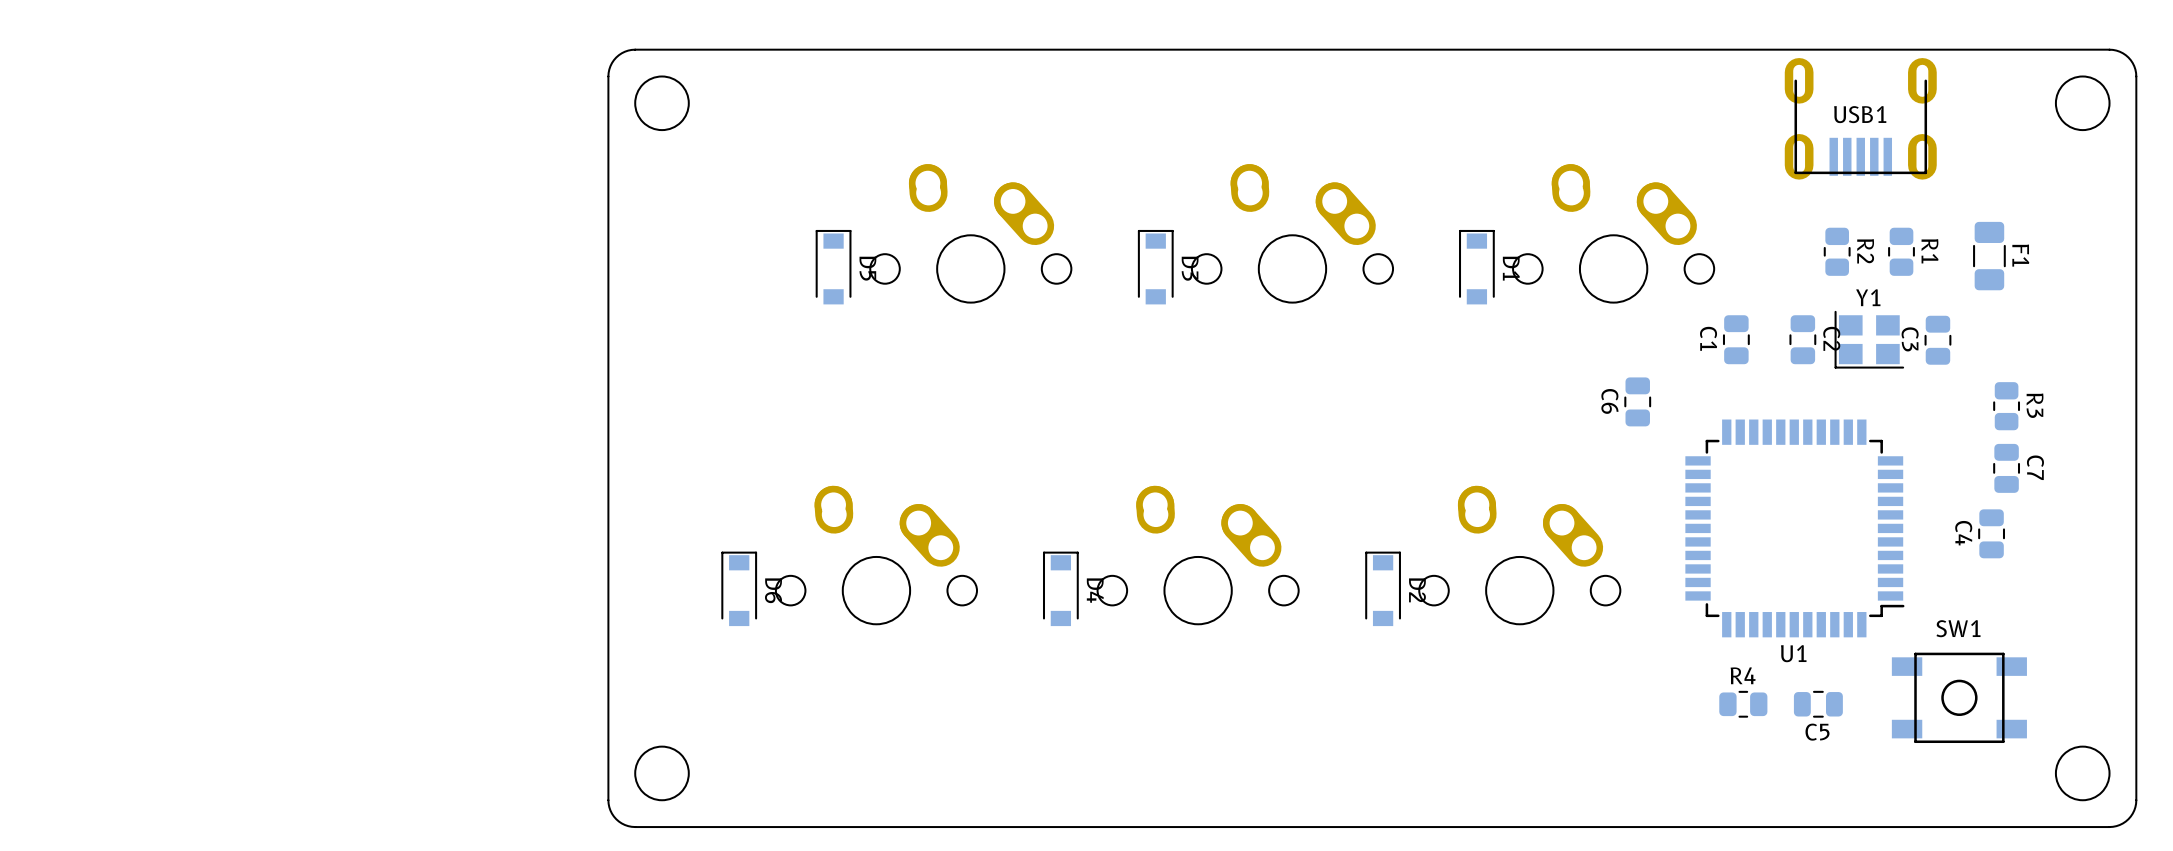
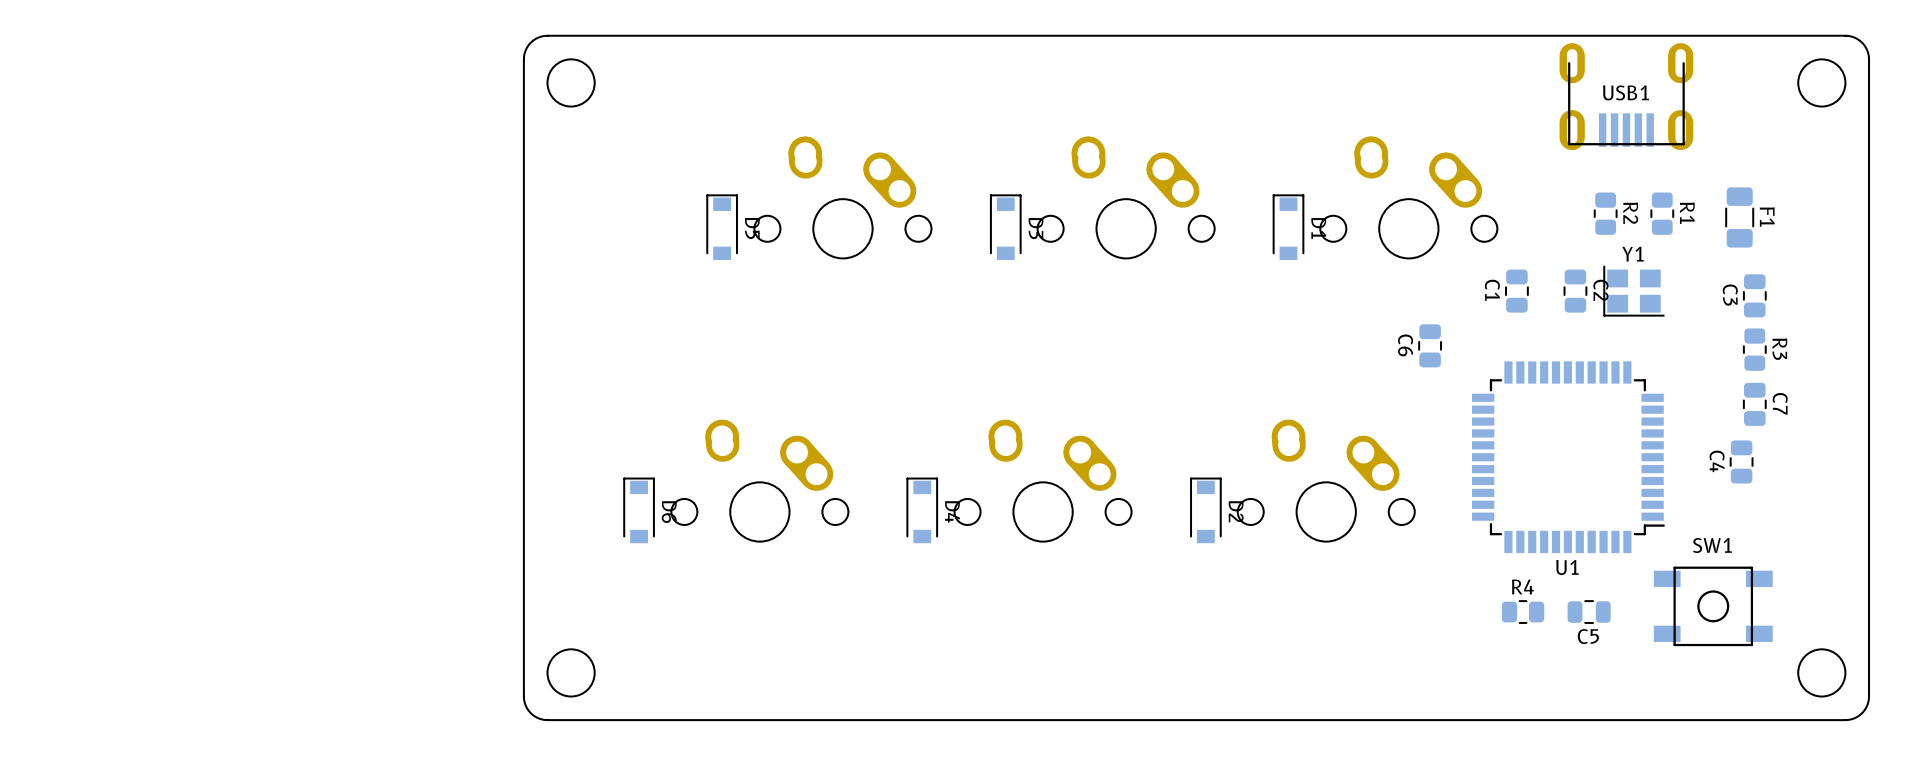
C3 position: (1937, 340) -> (1754, 295)

